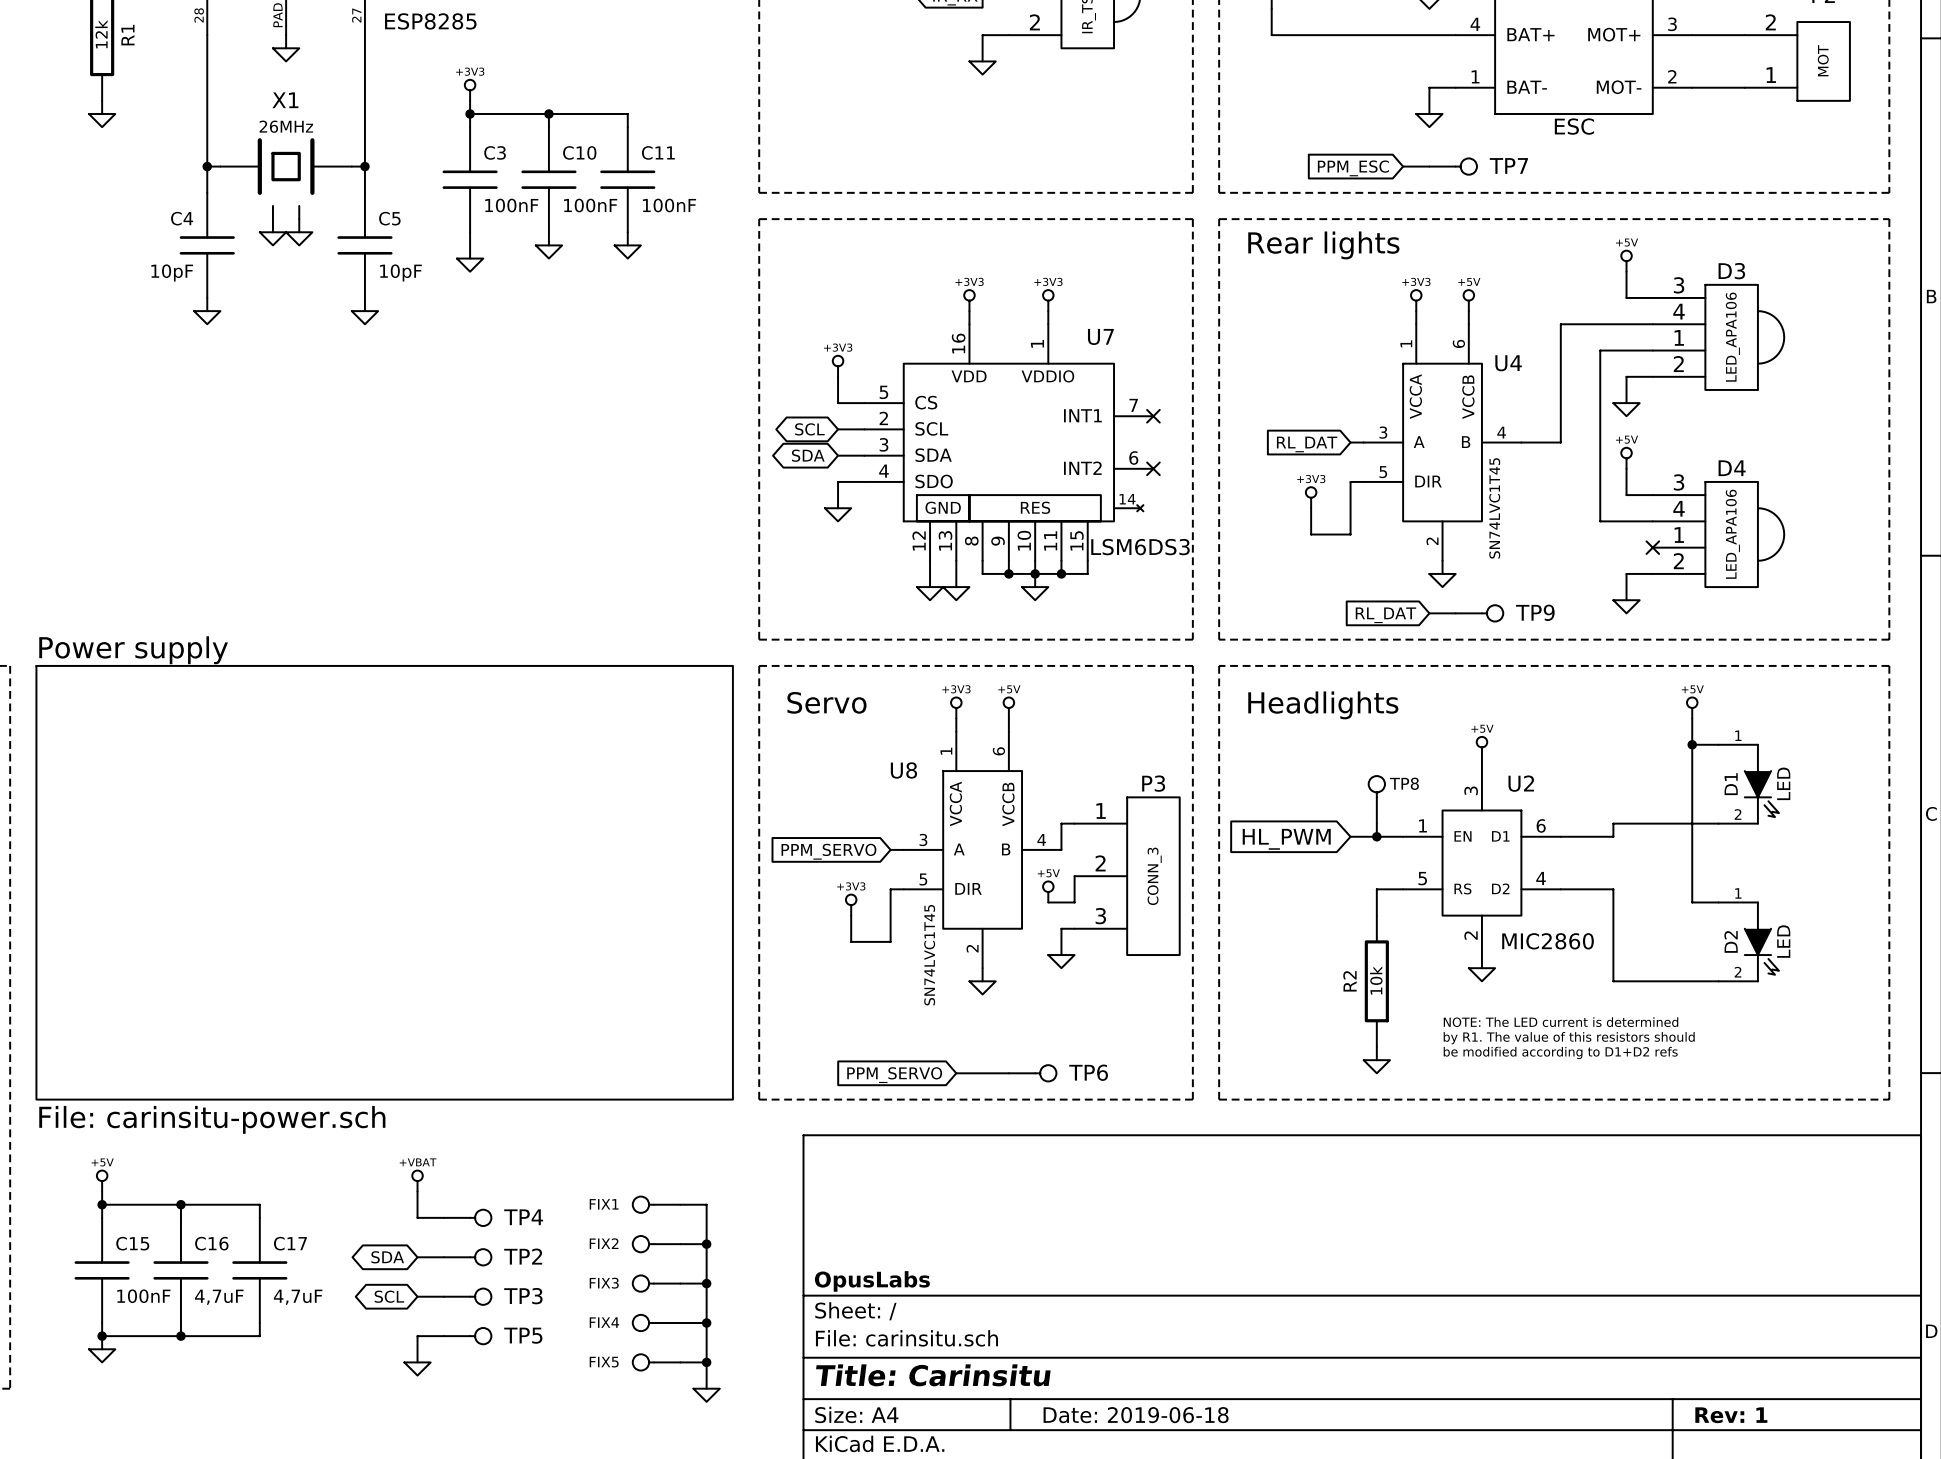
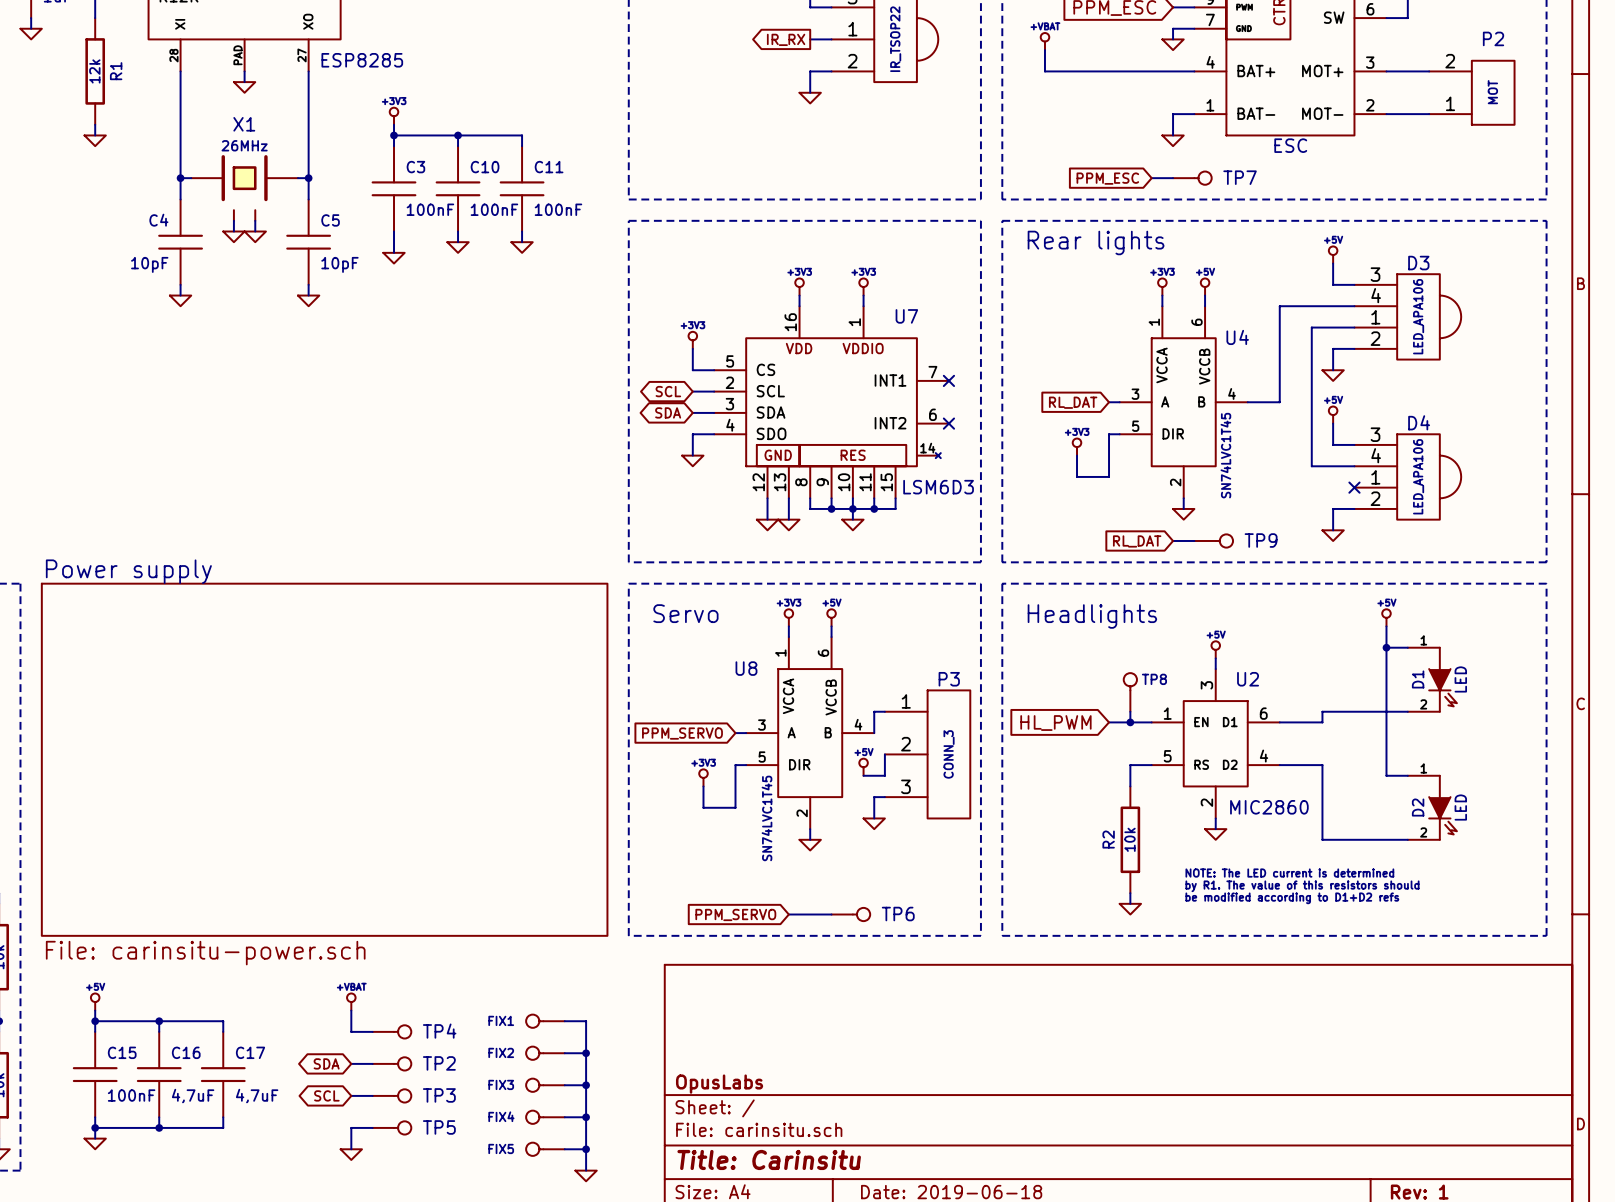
U7 value: LSM6DS3 (1140, 547) -> LSM6D3 (938, 487)

